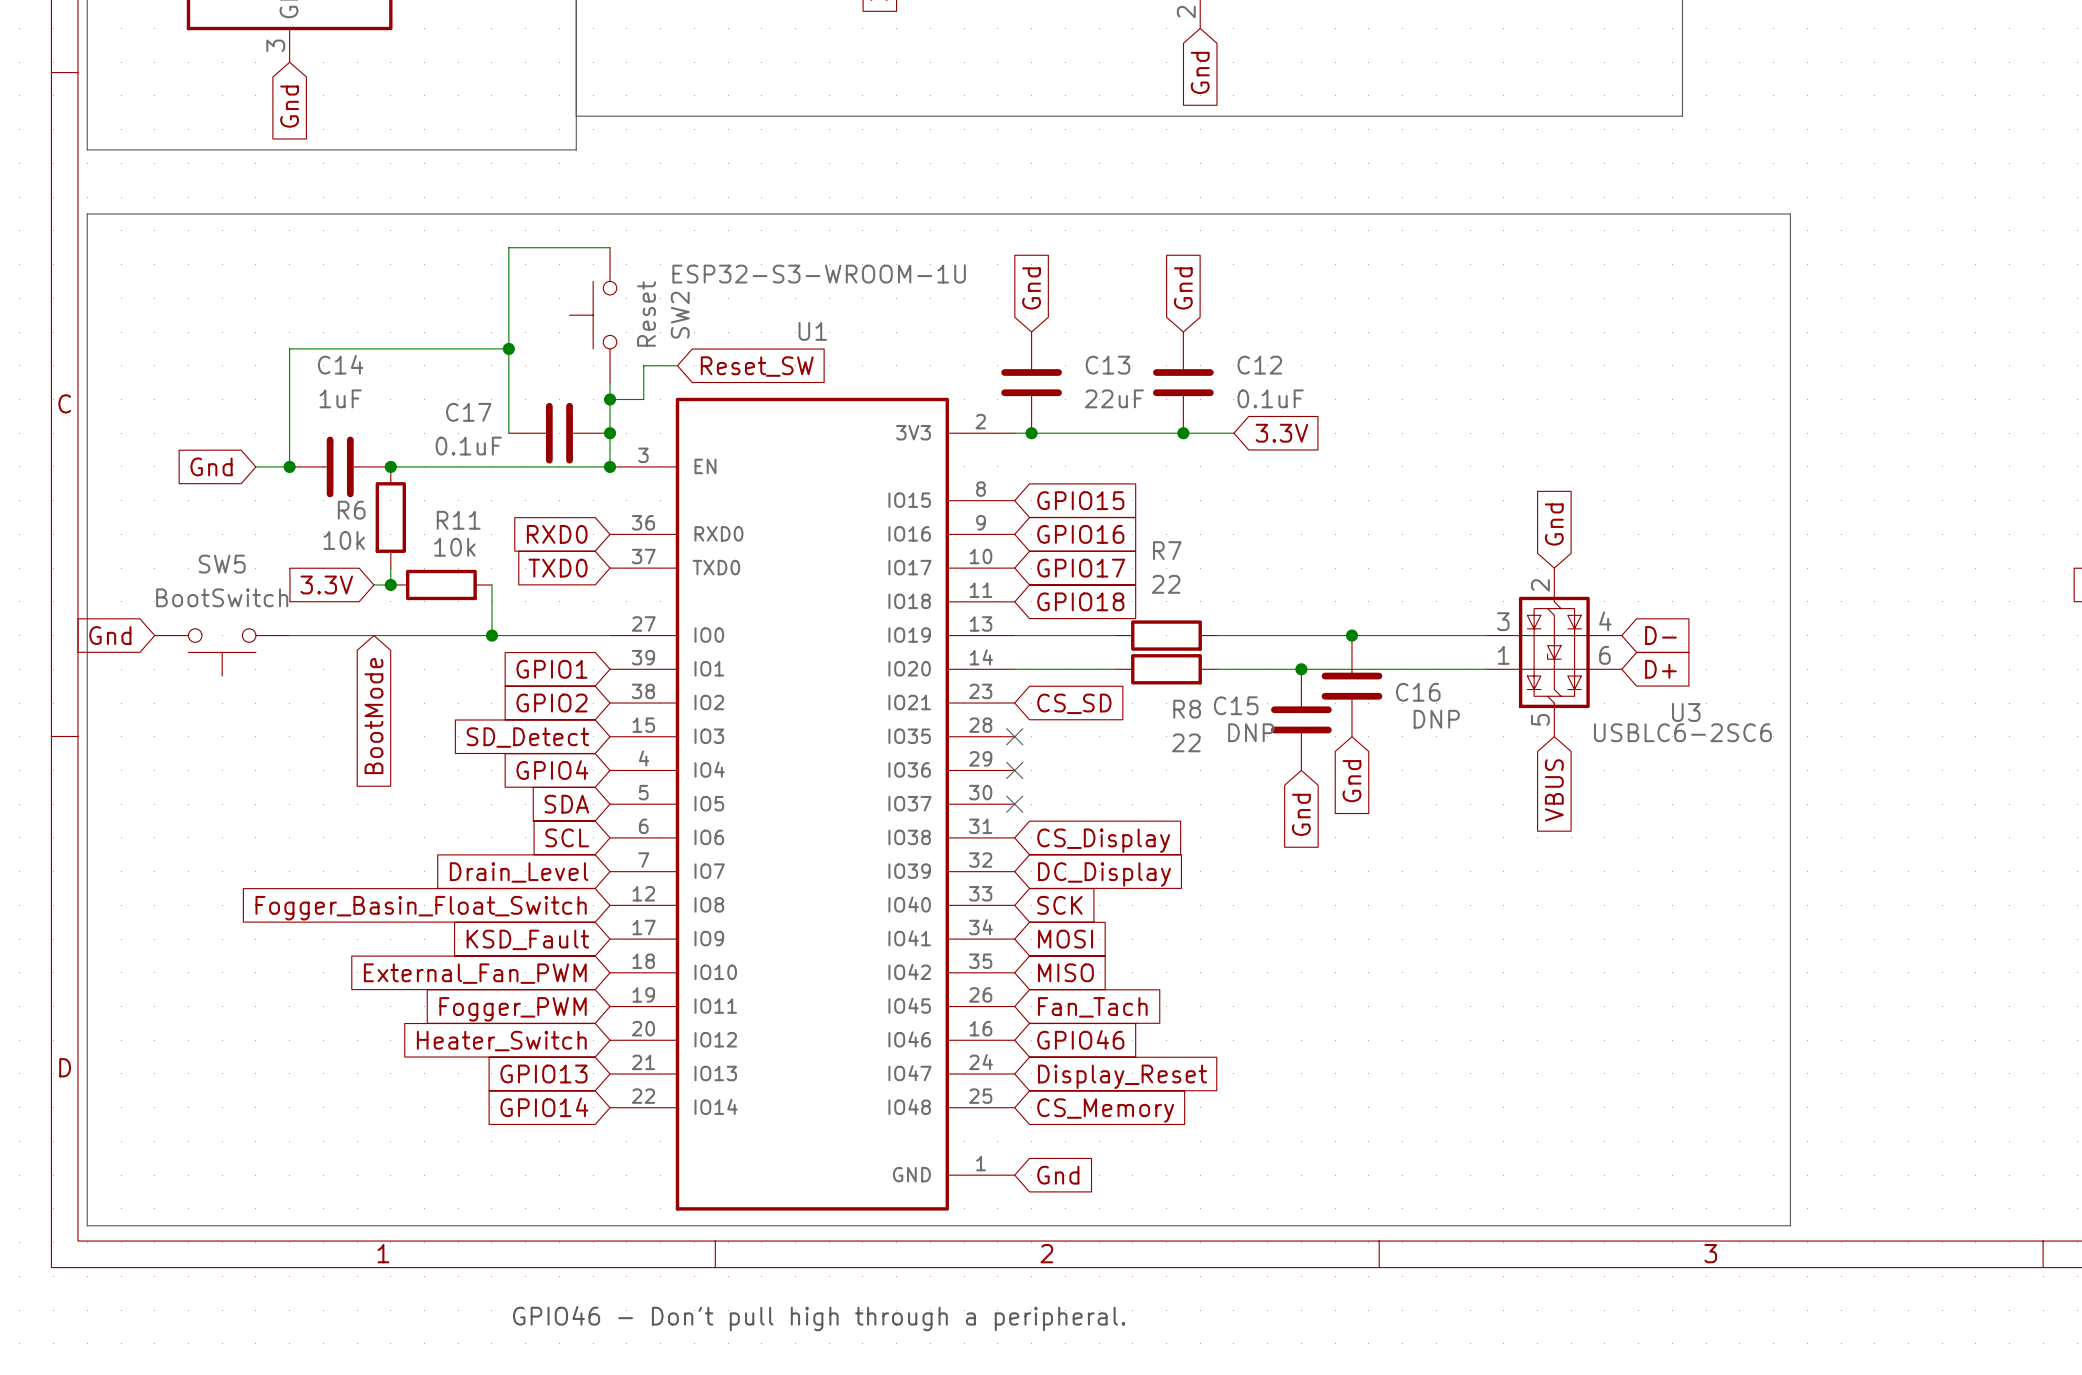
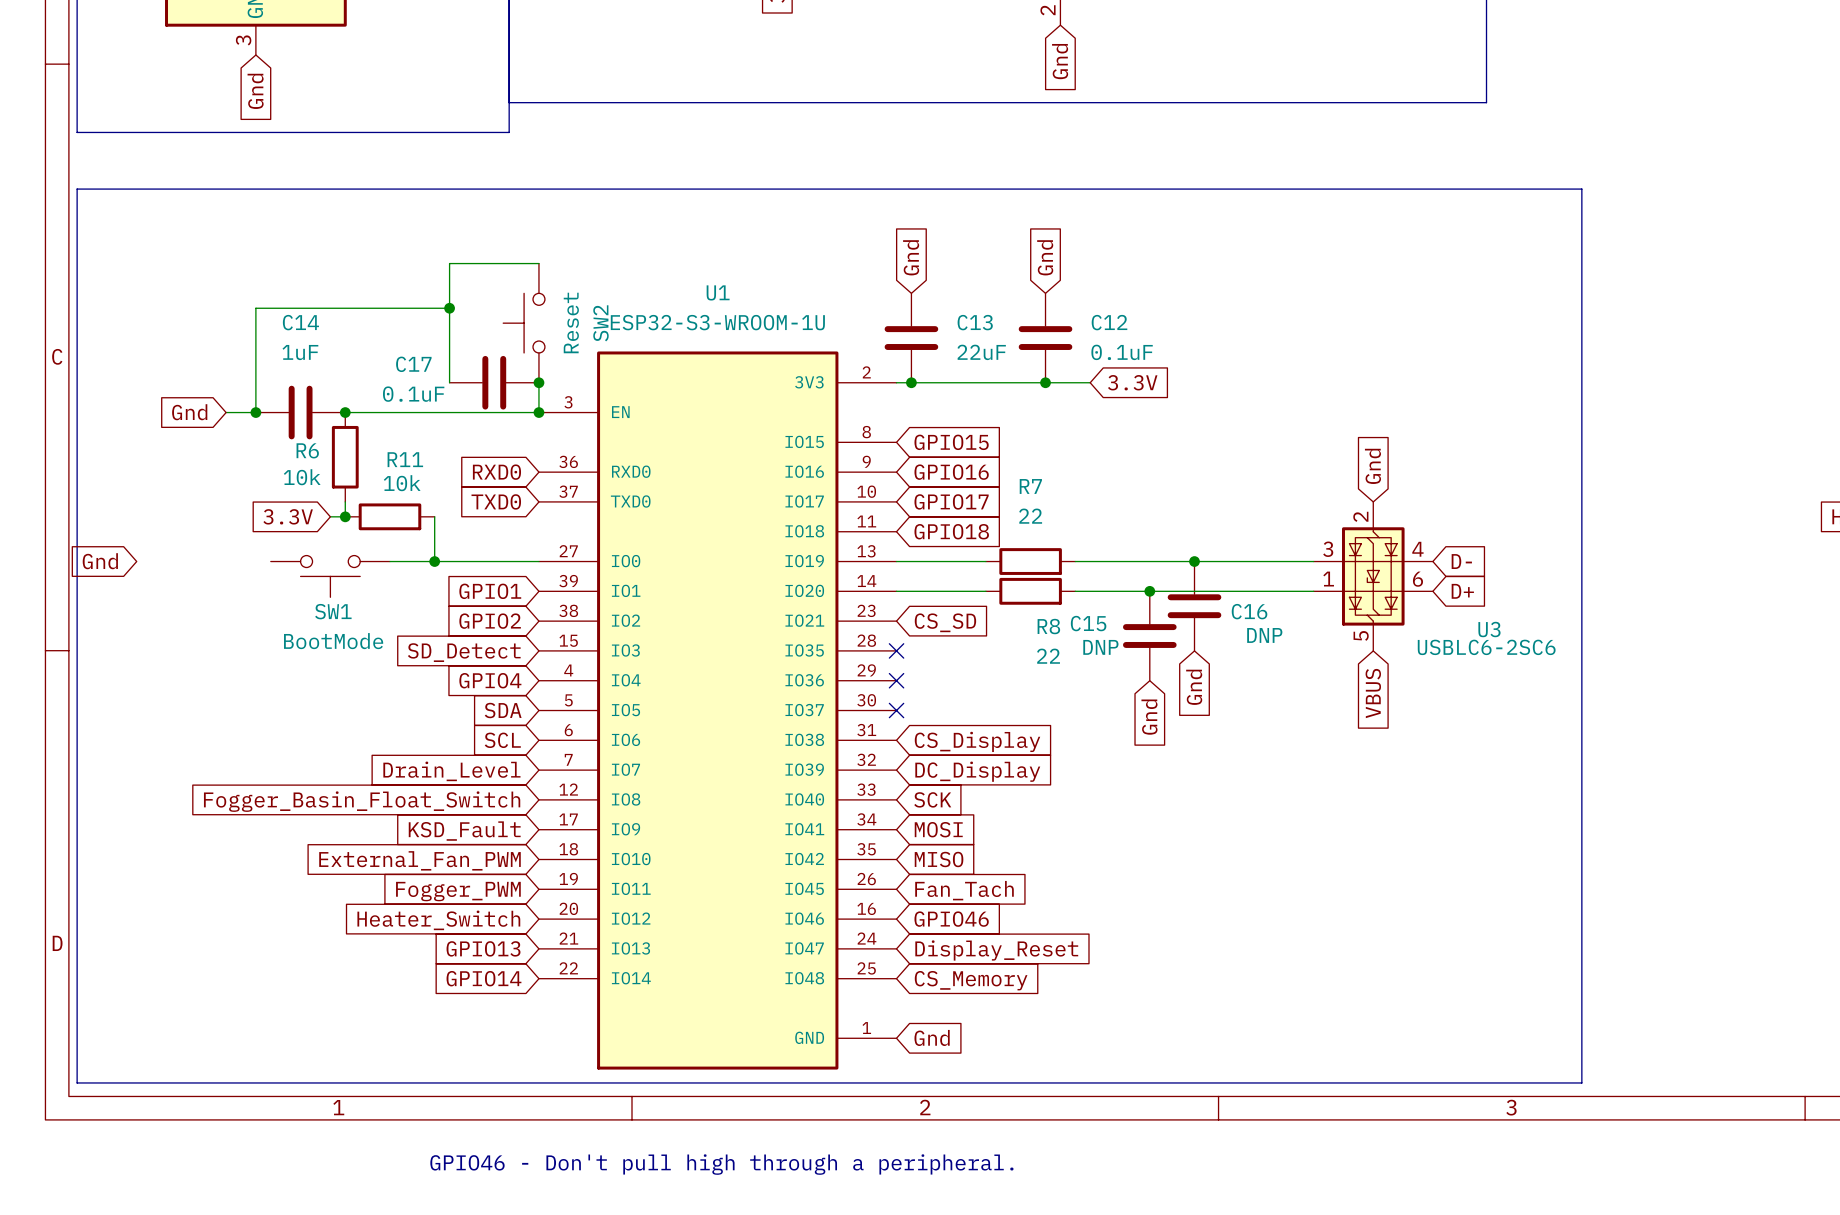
wire: (610, 247) (508, 247) (508, 298) -> (538, 263) (449, 263)
U1 value position: ESP32-S3-WROOM-1U (819, 274) -> ESP32-S3-WROOM-1U (717, 322)
SW2 position: (593, 315) -> (524, 323)
wire: (677, 365) (643, 365) (643, 399) (610, 399) -> none
global label: Reset_SW (757, 366) -> none
junction: (610, 399) -> none
wire: (289, 635) (441, 635) -> none
SW5: BootSwitch (222, 652) -> none
SW1: none -> BootMode (330, 576)
global label: BootMode (373, 716) -> none

